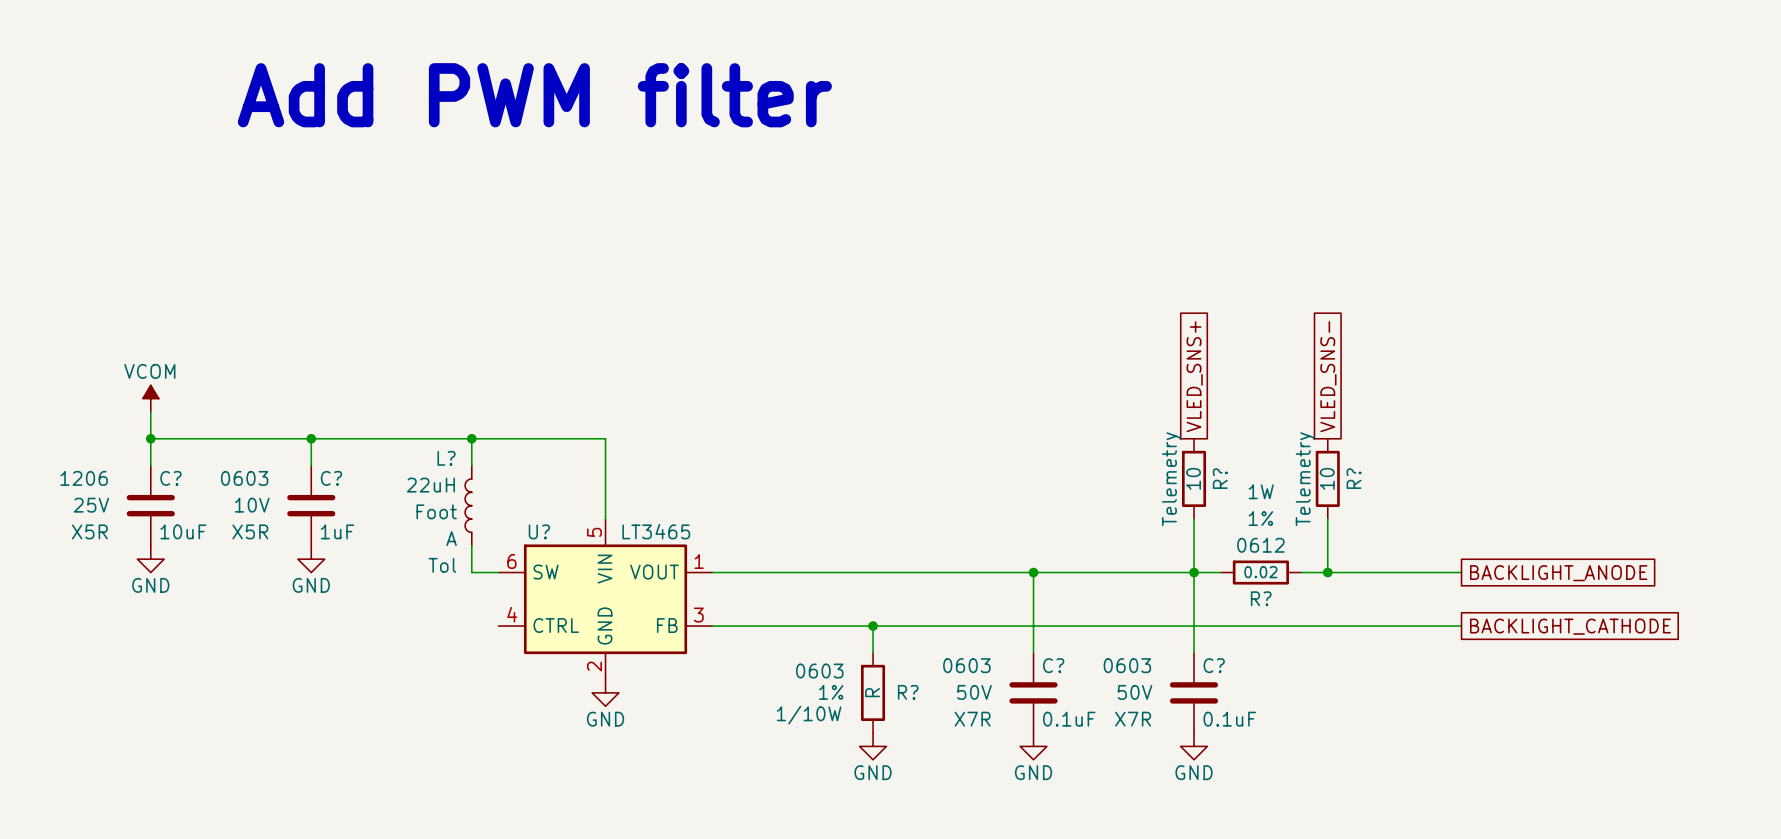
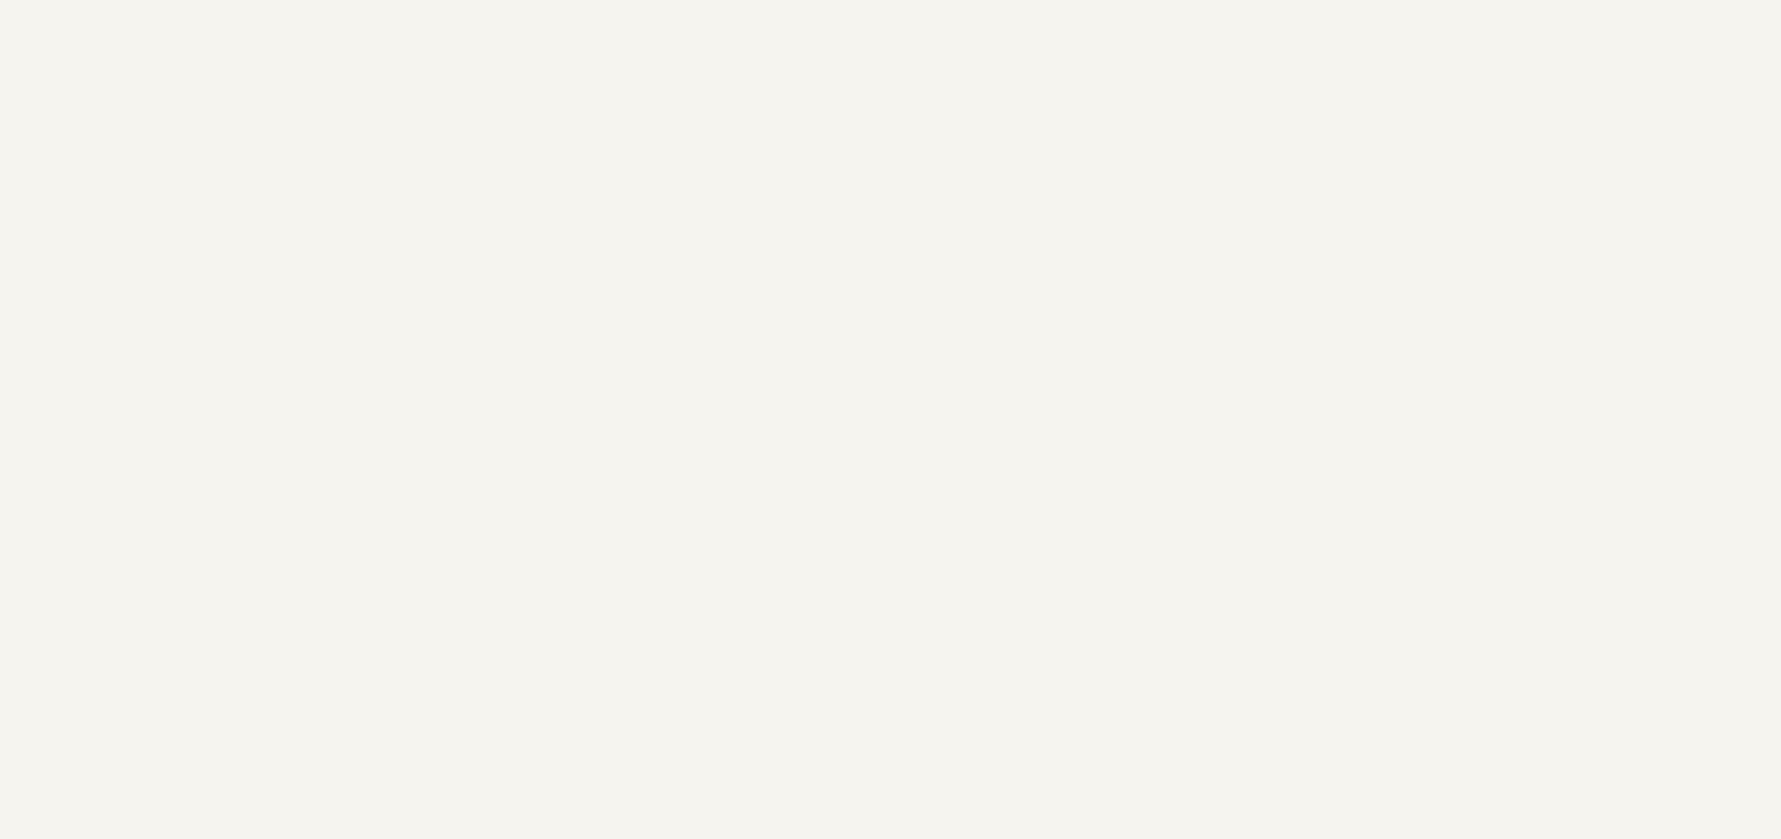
text: Add PWM filter (534, 95) -> none
global label: VLED_SNS+ (1194, 376) -> none
global label: VLED_SNS- (1328, 376) -> none
power symbol: VCOM (150, 398) -> none
wire: (150, 412) (150, 465) -> none
wire: (150, 438) (605, 438) (605, 519) -> none
junction: (150, 438) -> none
wire: (311, 438) (311, 465) -> none
junction: (311, 438) -> none
wire: (471, 438) (471, 465) -> none
junction: (471, 438) -> none
R?: 10 (1194, 478) -> none
R?: 10 (1327, 478) -> none
C?: 10uF (150, 505) -> none
C?: 1uF (311, 505) -> none
L?: 22uH (468, 505) -> none
wire: (1194, 519) (1194, 652) -> none
wire: (1327, 519) (1327, 572) -> none
wire: (471, 545) (471, 572) (498, 572) -> none
power symbol: GND (150, 559) -> none
power symbol: GND (311, 559) -> none
wire: (712, 572) (1220, 572) -> none
wire: (1033, 572) (1033, 652) -> none
junction: (1033, 572) -> none
junction: (1194, 572) -> none
R?: 0.02 (1260, 572) -> none
wire: (1301, 572) (1461, 572) -> none
junction: (1327, 572) -> none
global label: BACKLIGHT_ANODE (1558, 573) -> none
U?: LT3465 (605, 599) -> none
wire: (712, 626) (1461, 626) -> none
wire: (873, 626) (873, 652) -> none
junction: (873, 626) -> none
global label: BACKLIGHT_CATHODE (1570, 626) -> none
power symbol: GND (605, 692) -> none
R?: R (873, 692) -> none
C?: 0.1uF (1033, 692) -> none
C?: 0.1uF (1194, 692) -> none
power symbol: GND (873, 746) -> none
power symbol: GND (1033, 746) -> none
power symbol: GND (1194, 746) -> none

